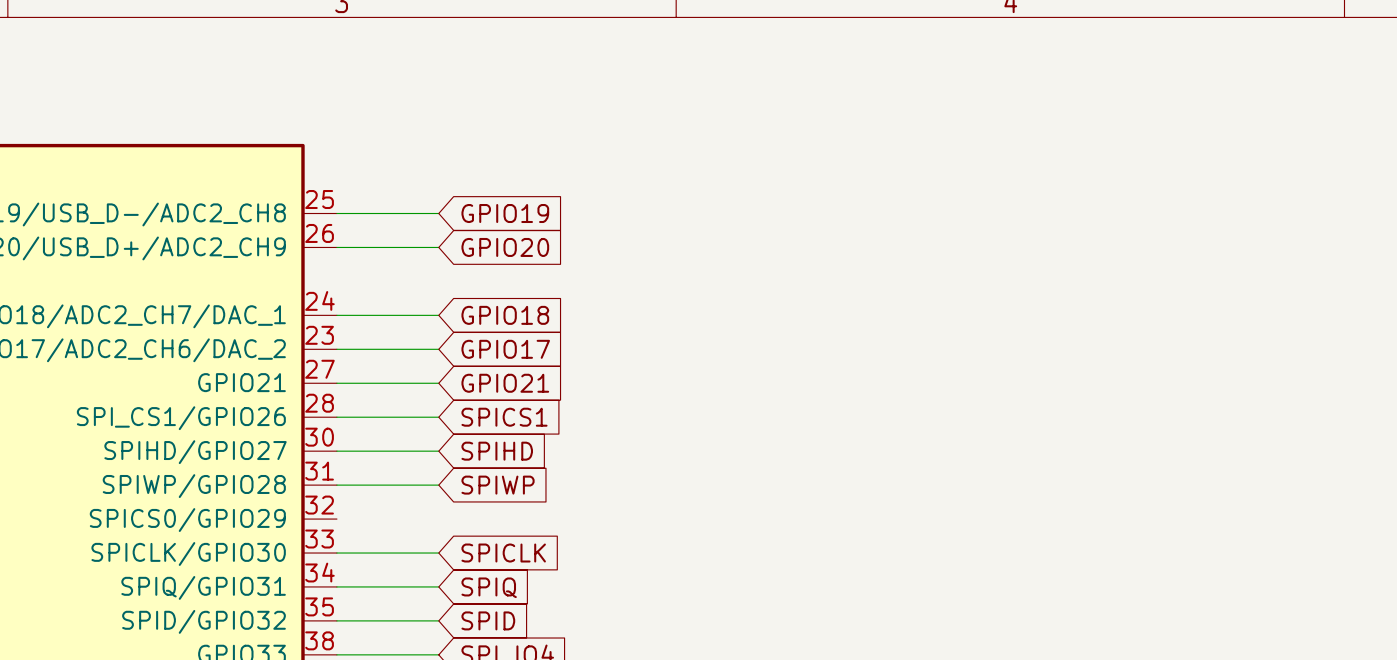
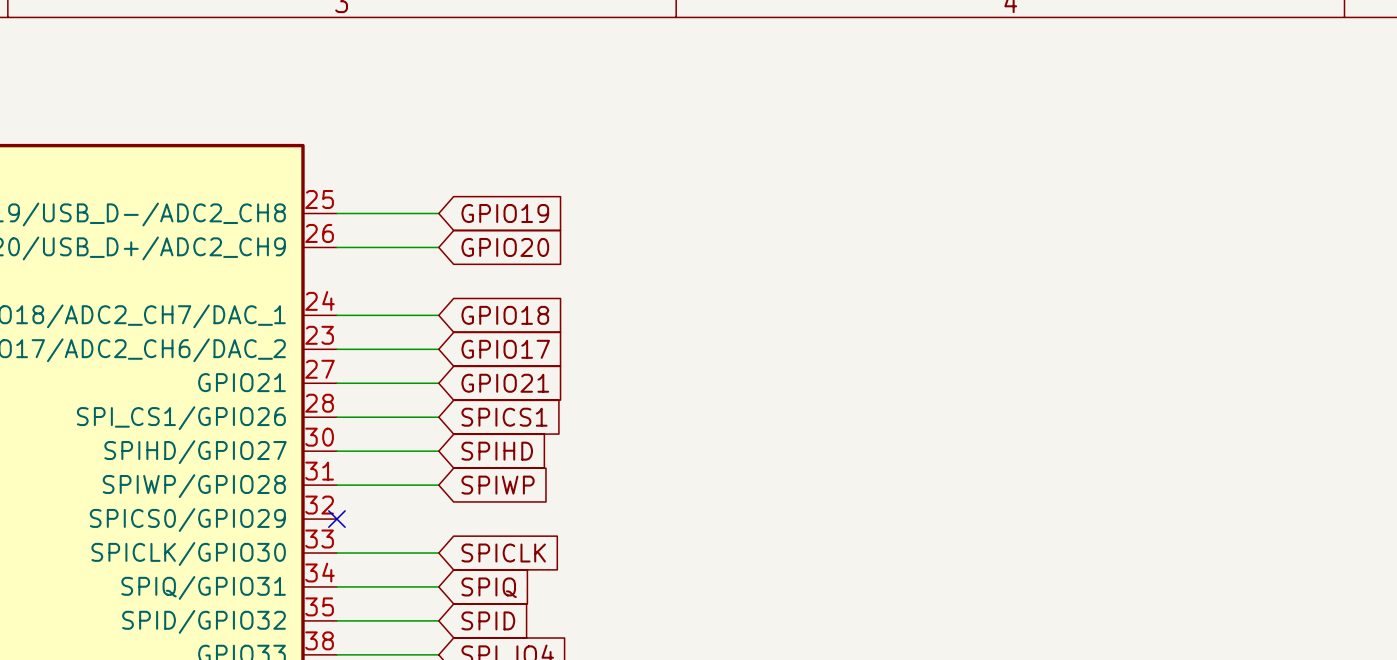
no-connect mark: none -> (336, 519)

